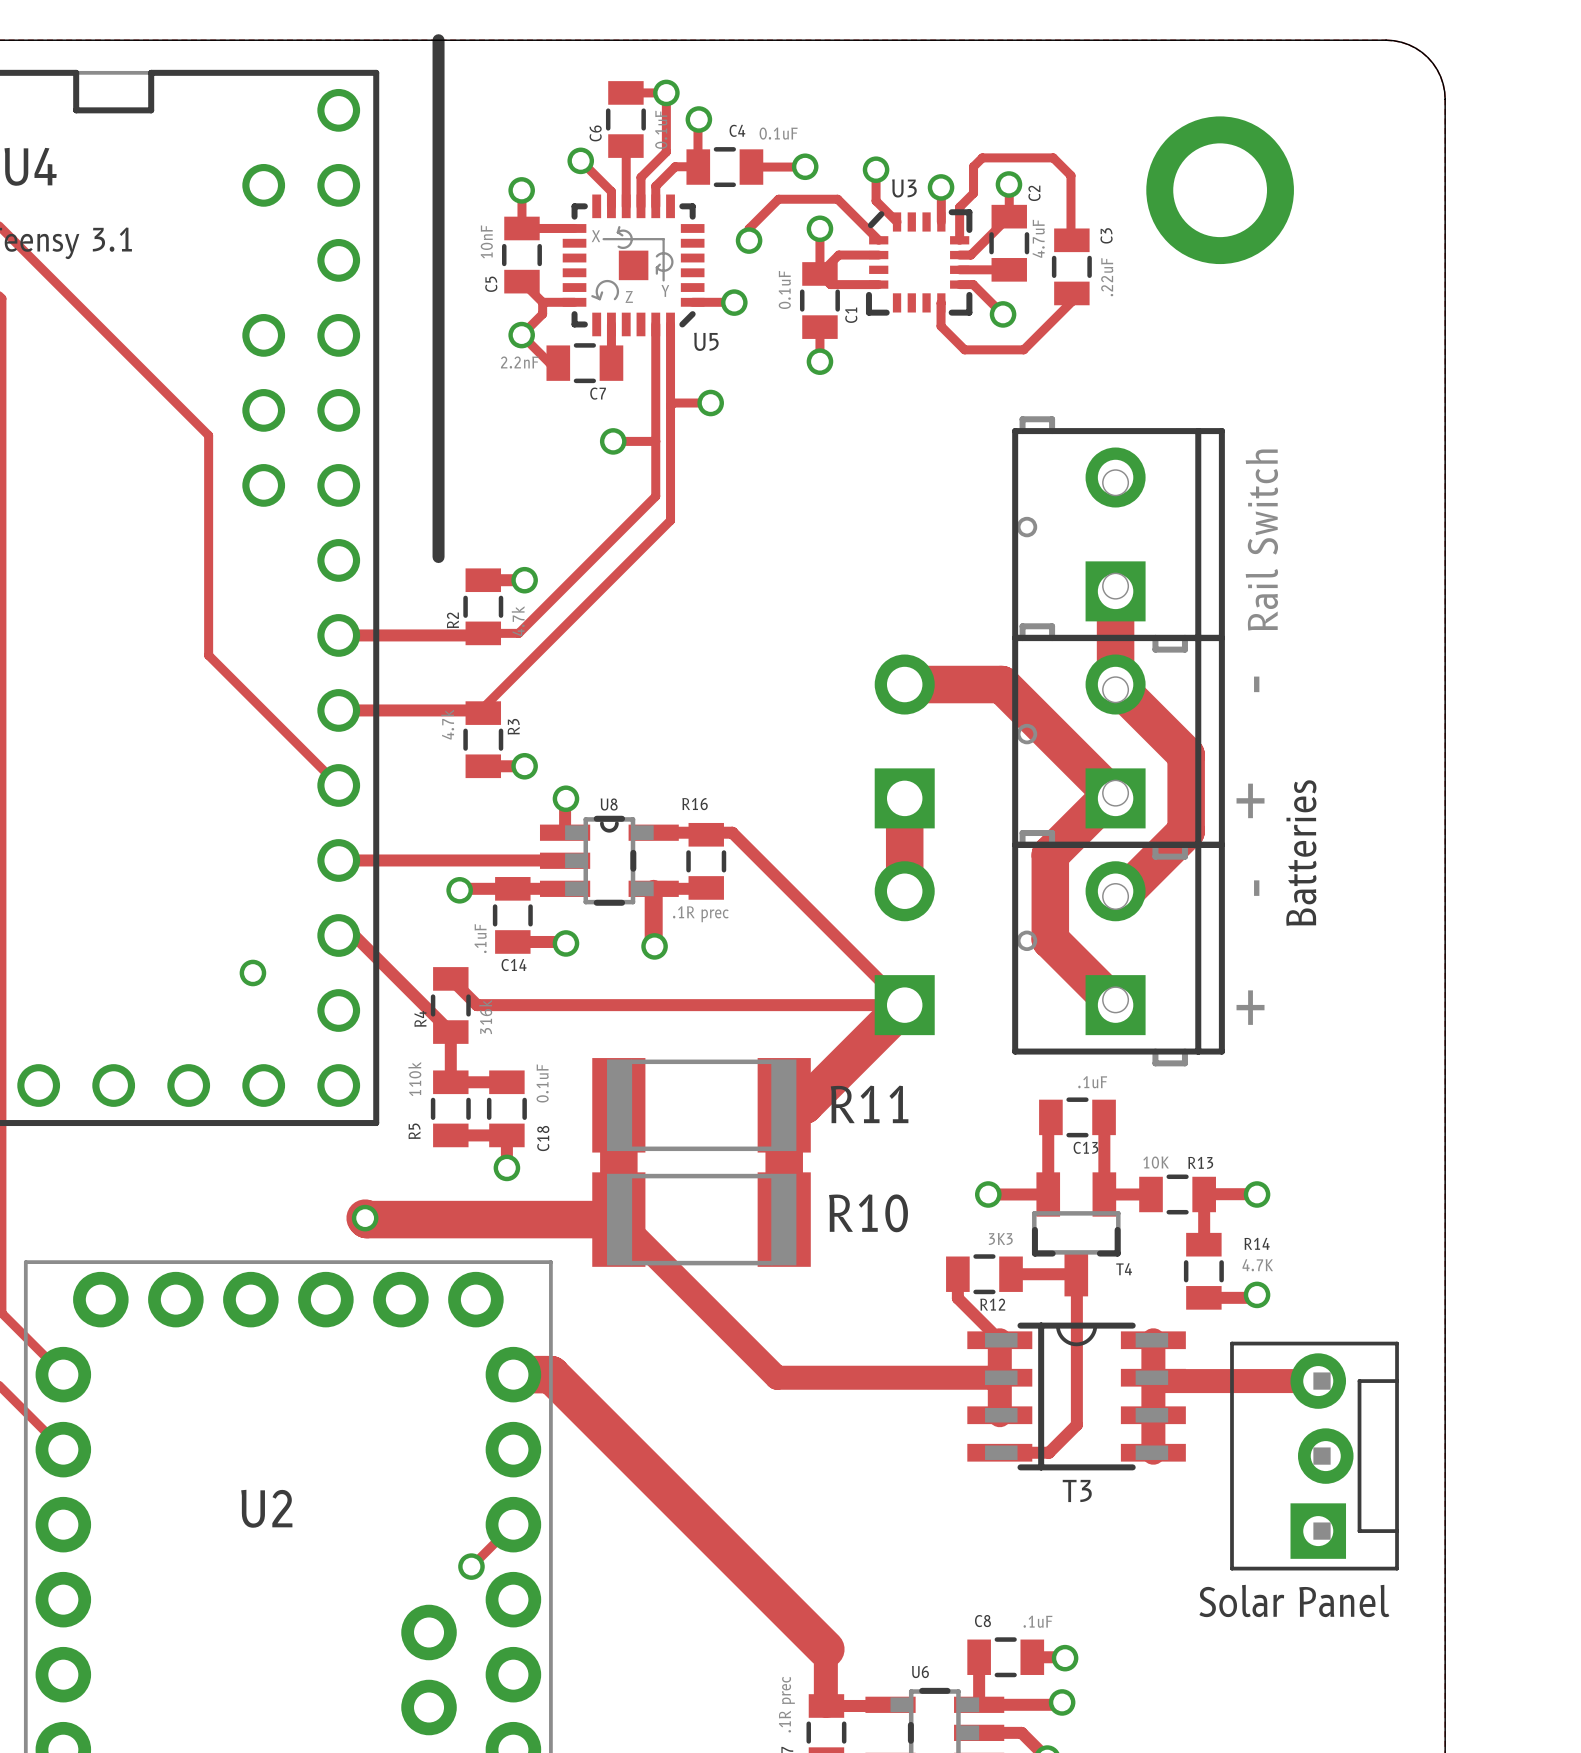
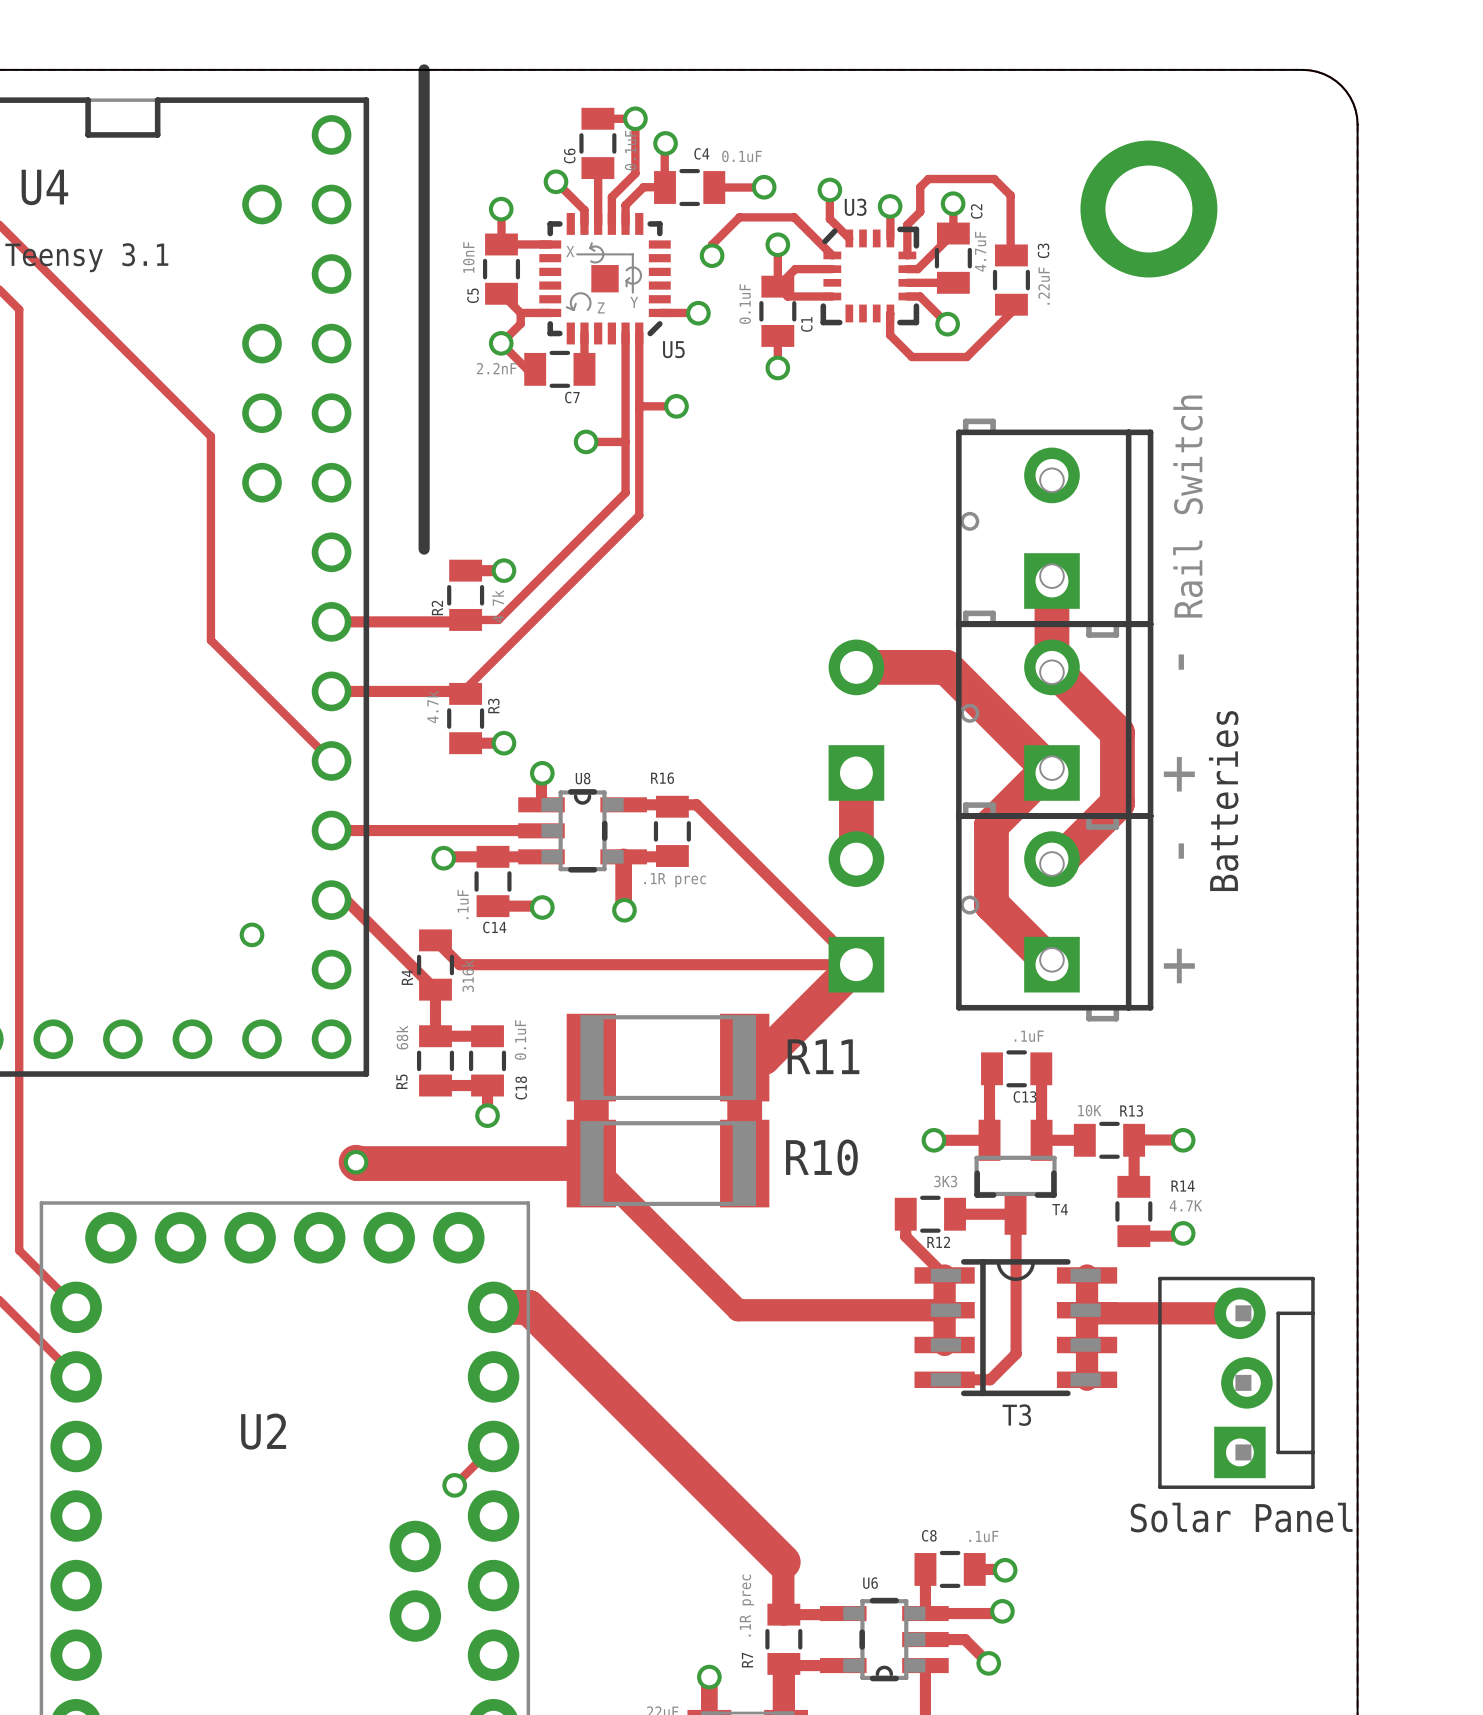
R5 value: 110k (414, 1079) -> 68k (402, 1037)

